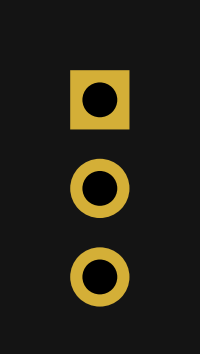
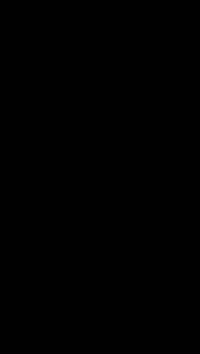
part: (99, 188) -> none

